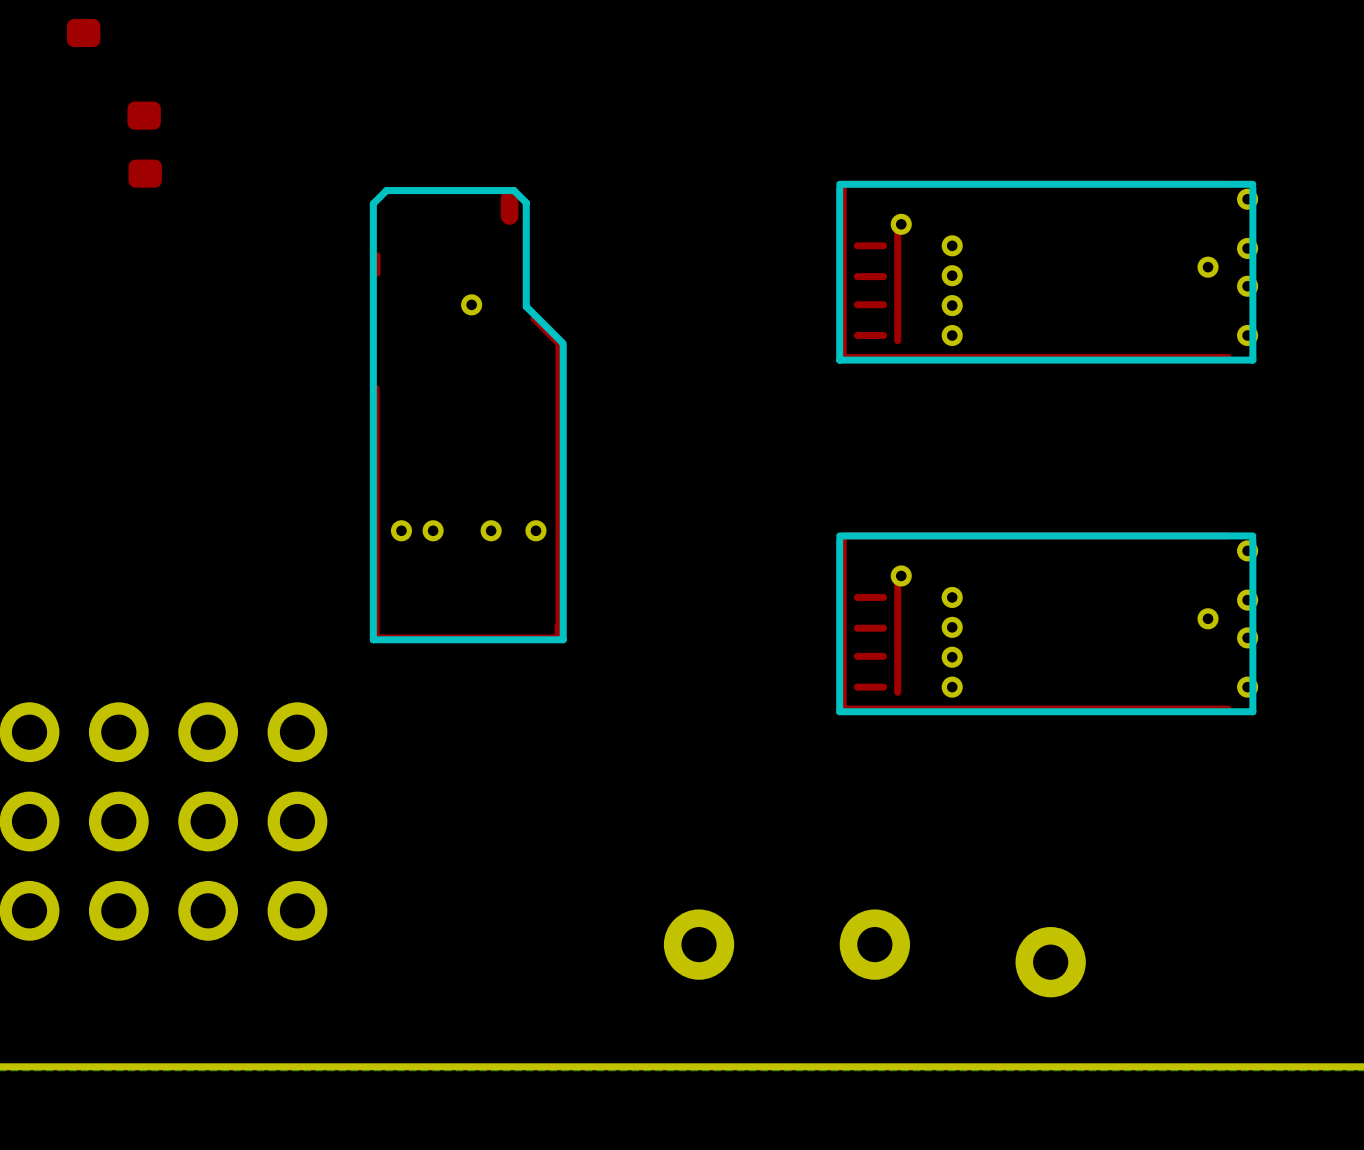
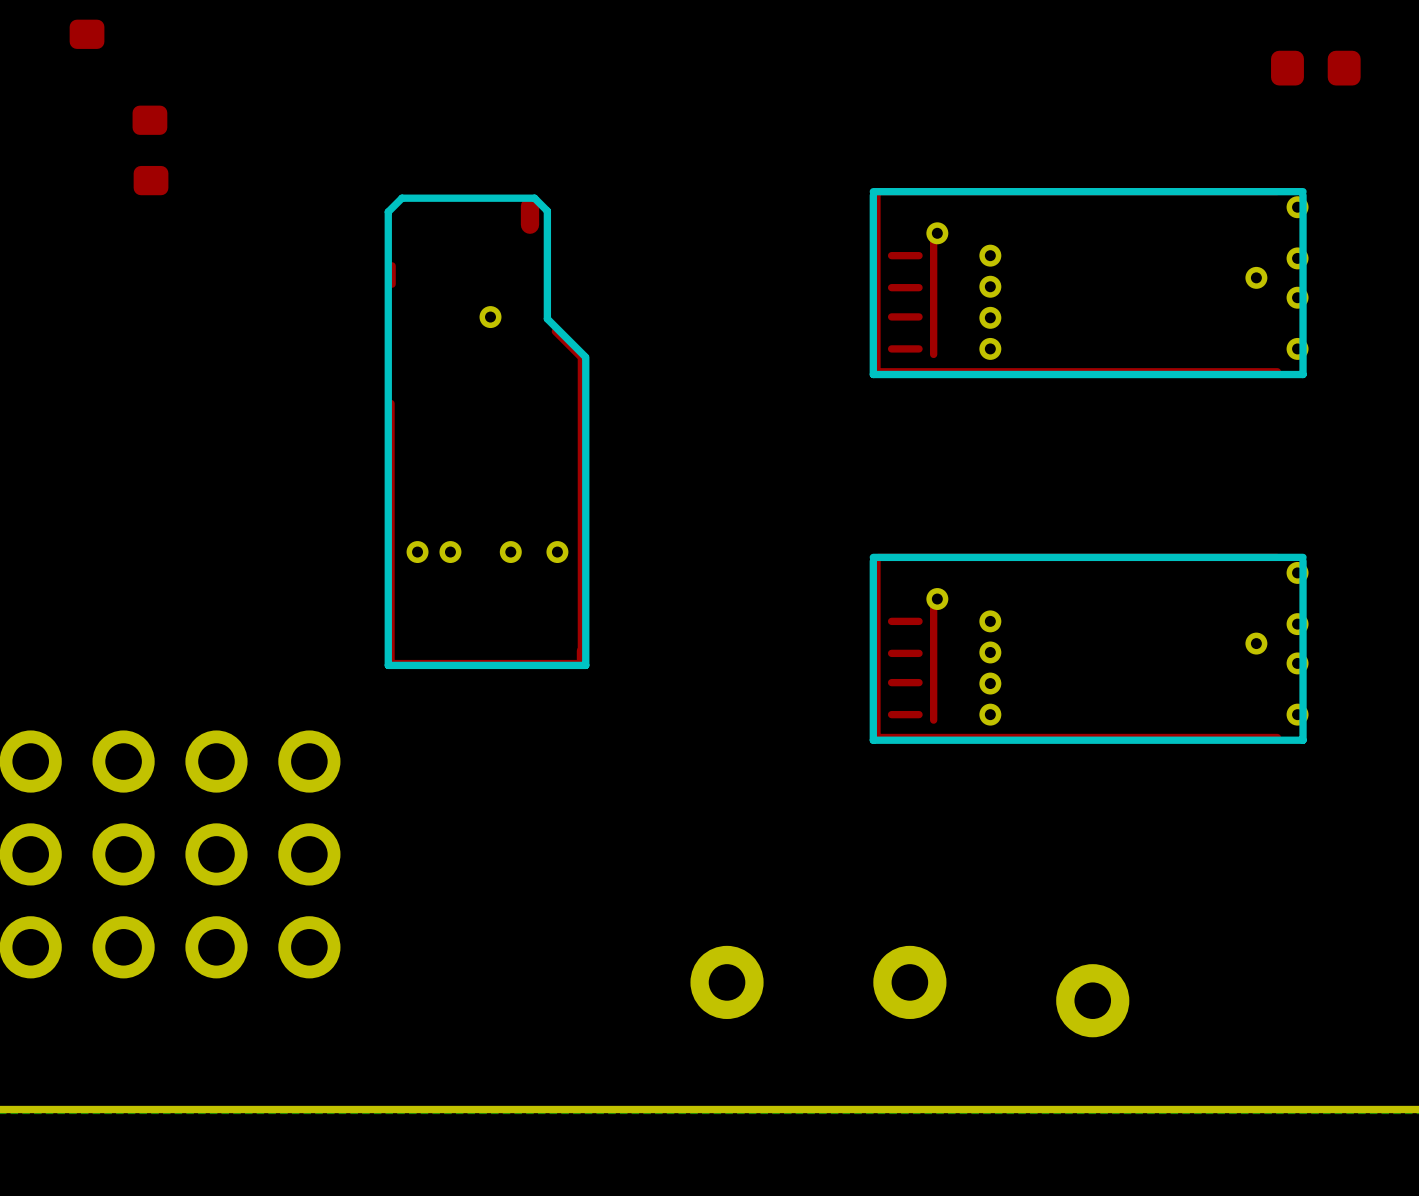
part: none -> (1315, 68)

